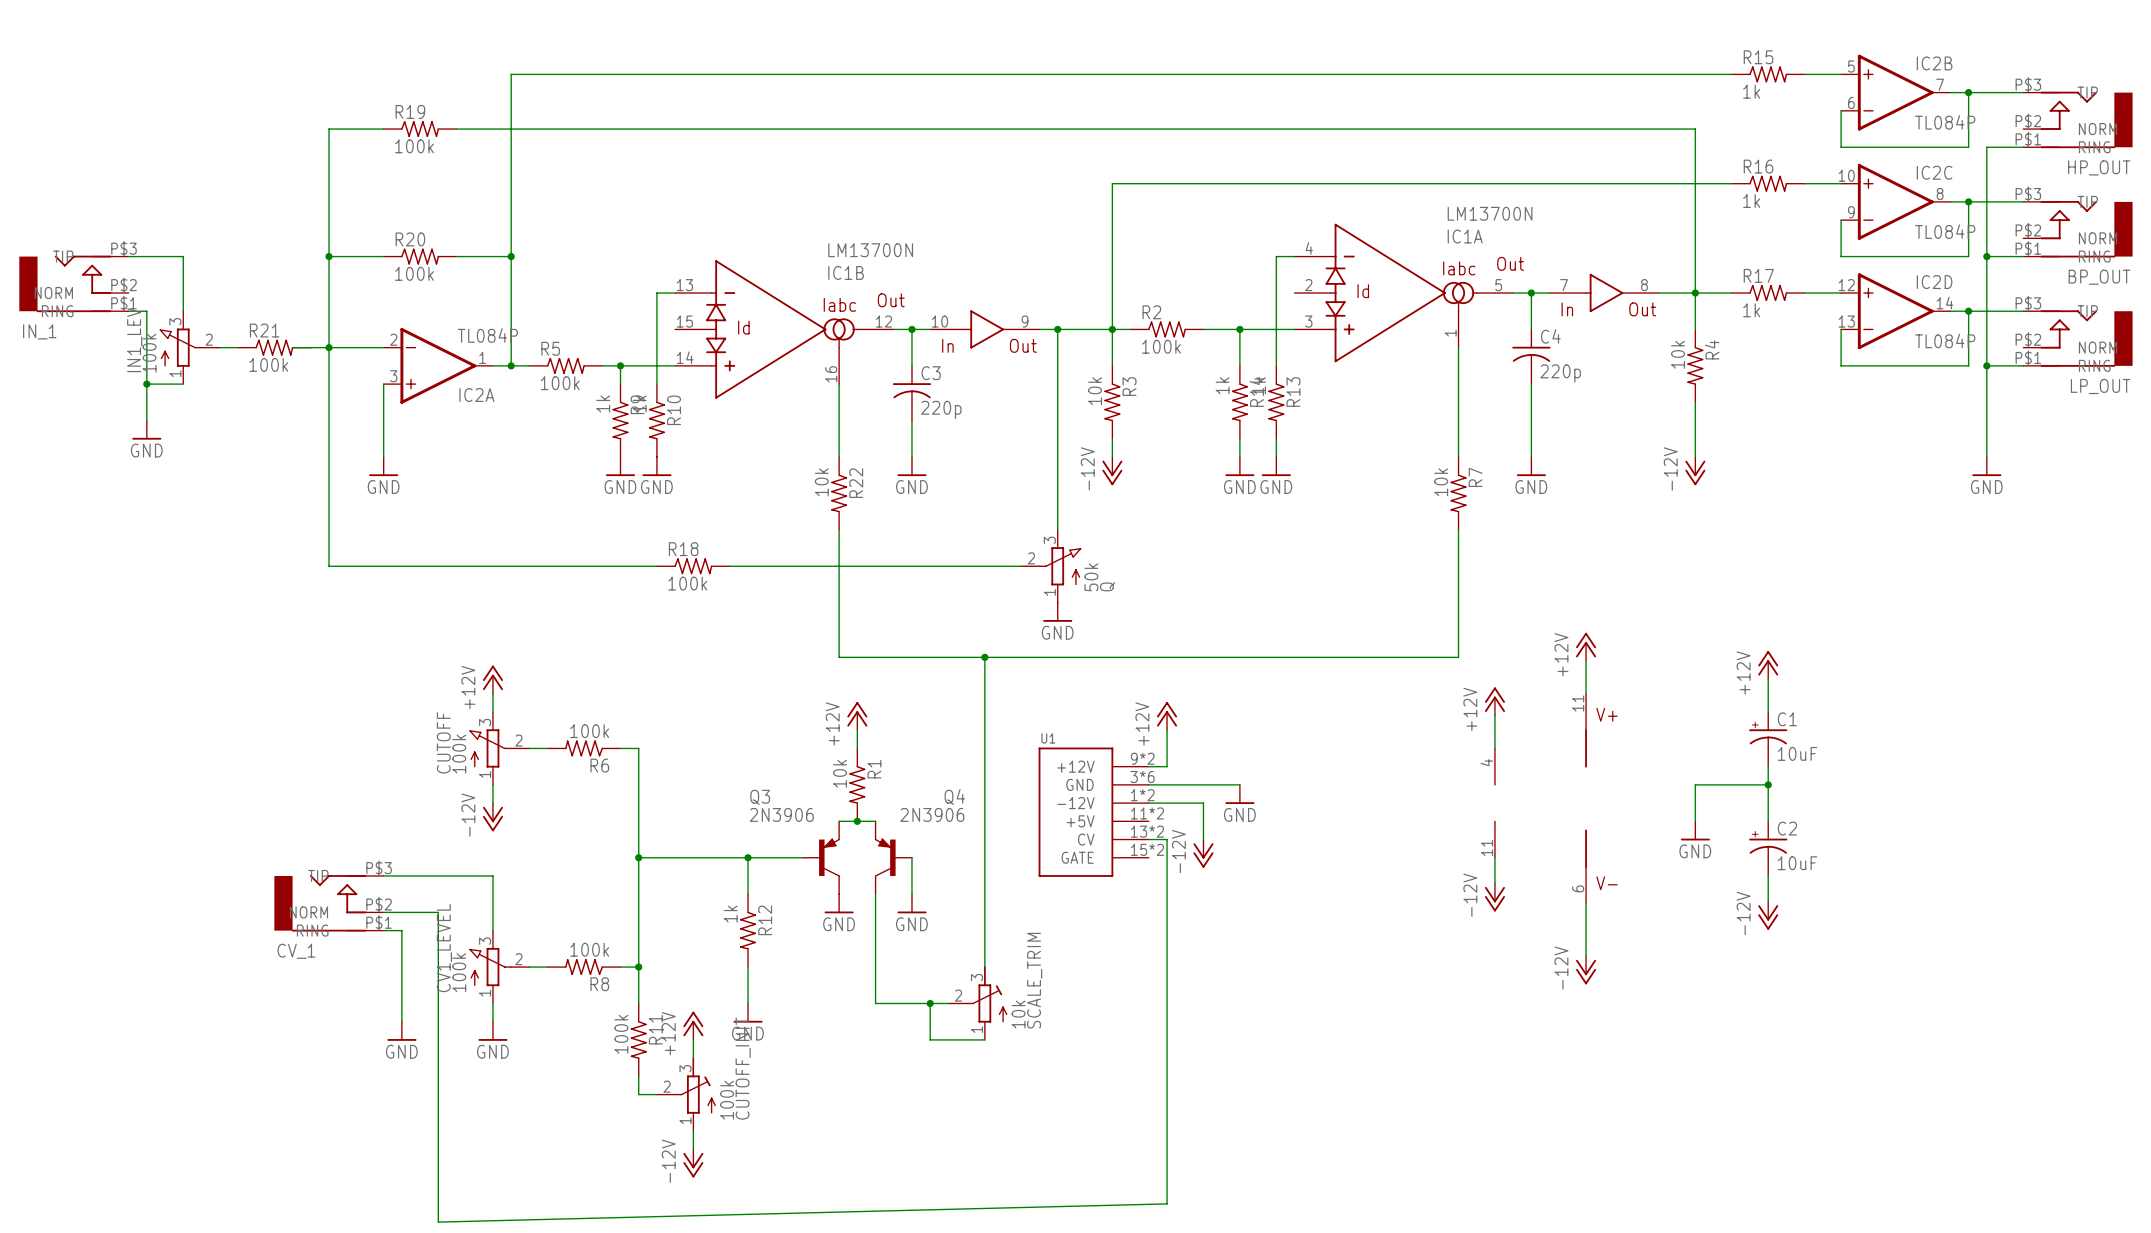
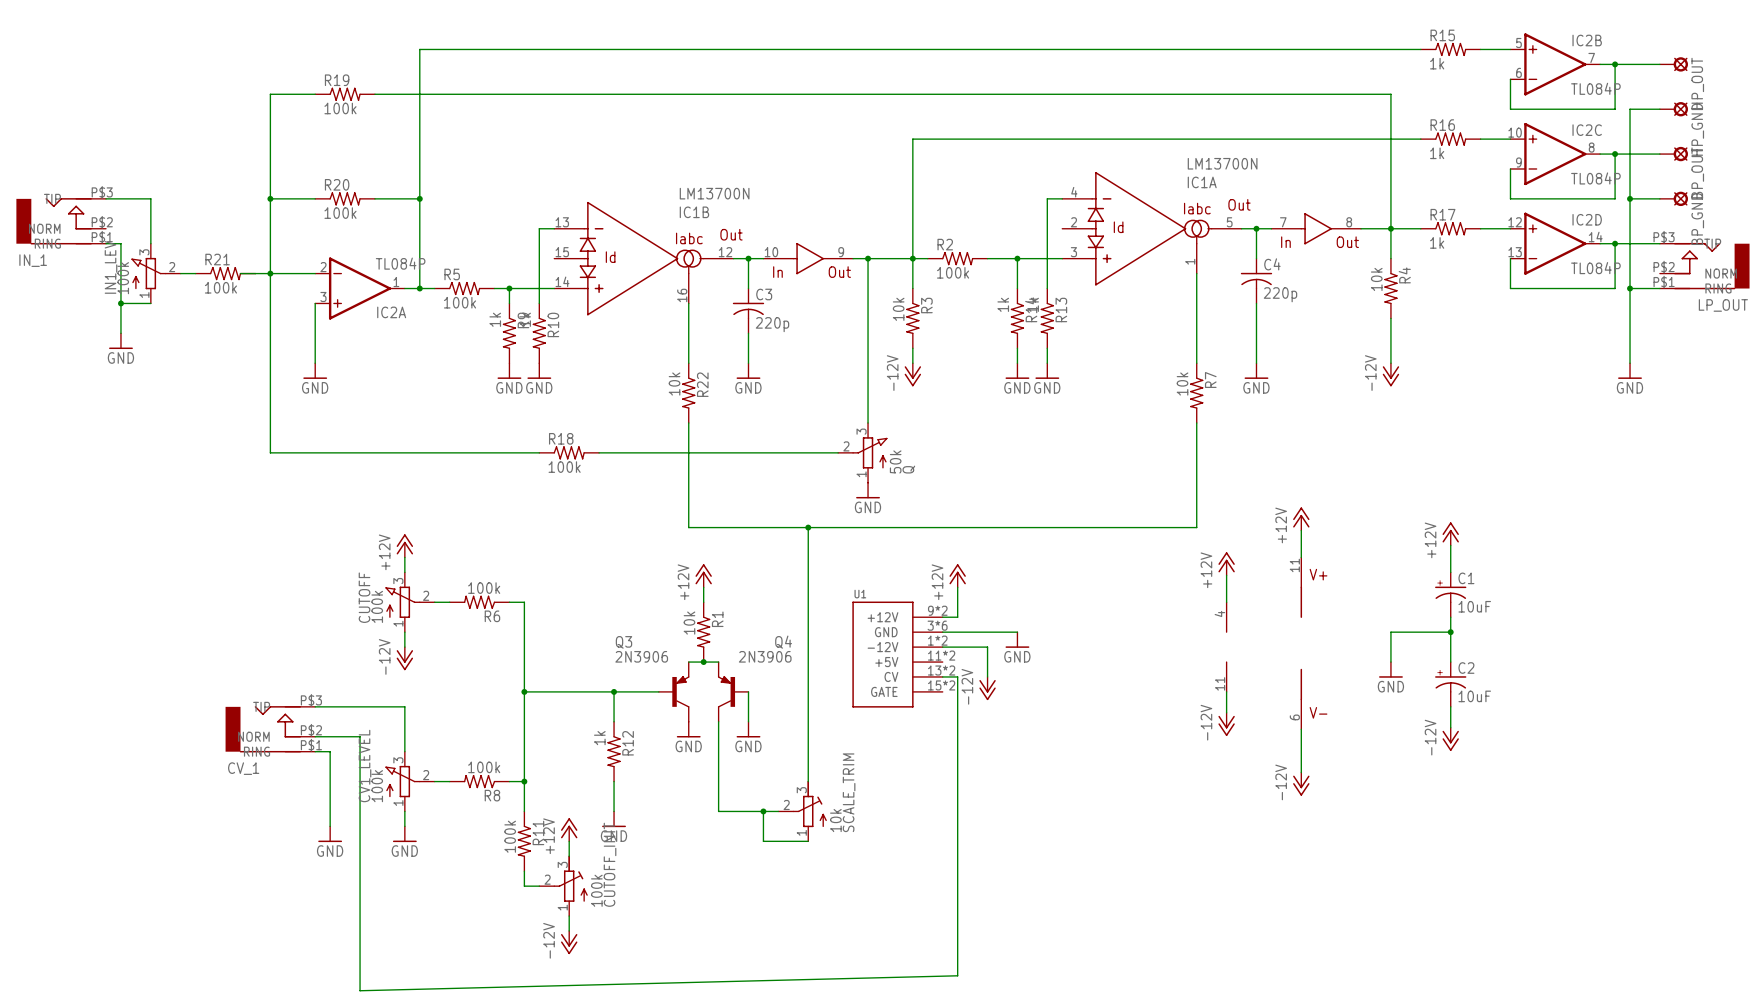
HP_OUT: none -> (1673, 64)
HP_OUT: (2077, 119) -> none
HP_GND: none -> (1673, 109)
BP_OUT: none -> (1673, 154)
BP_OUT: (2077, 229) -> none
BP_GND: none -> (1673, 198)

